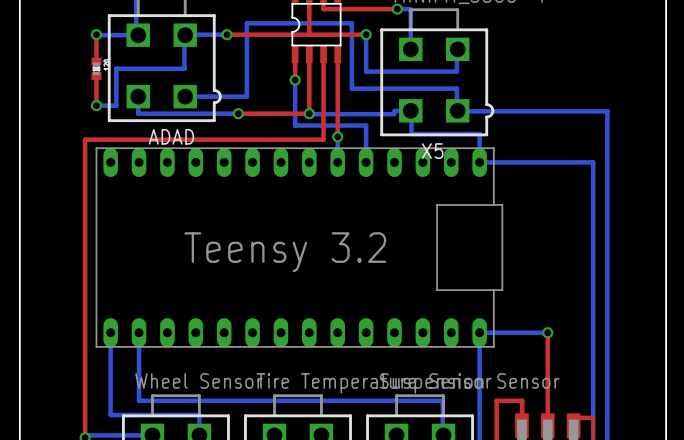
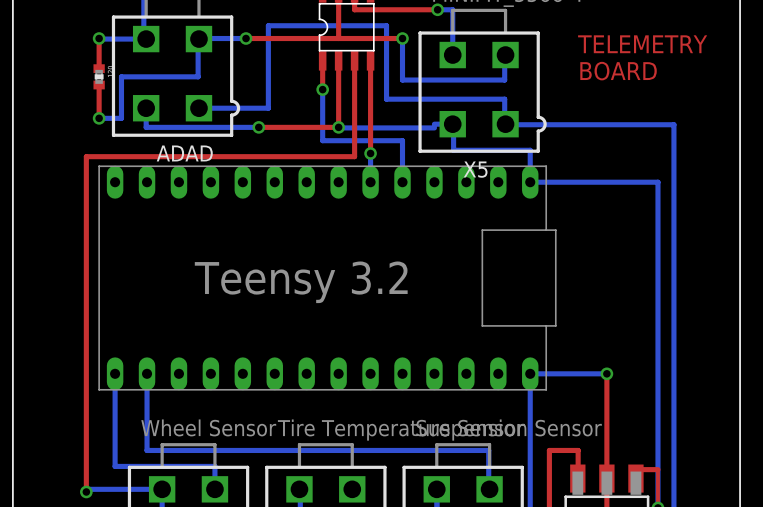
text: none -> TELEMETRY (642, 44)
text: none -> BOARD (618, 71)

